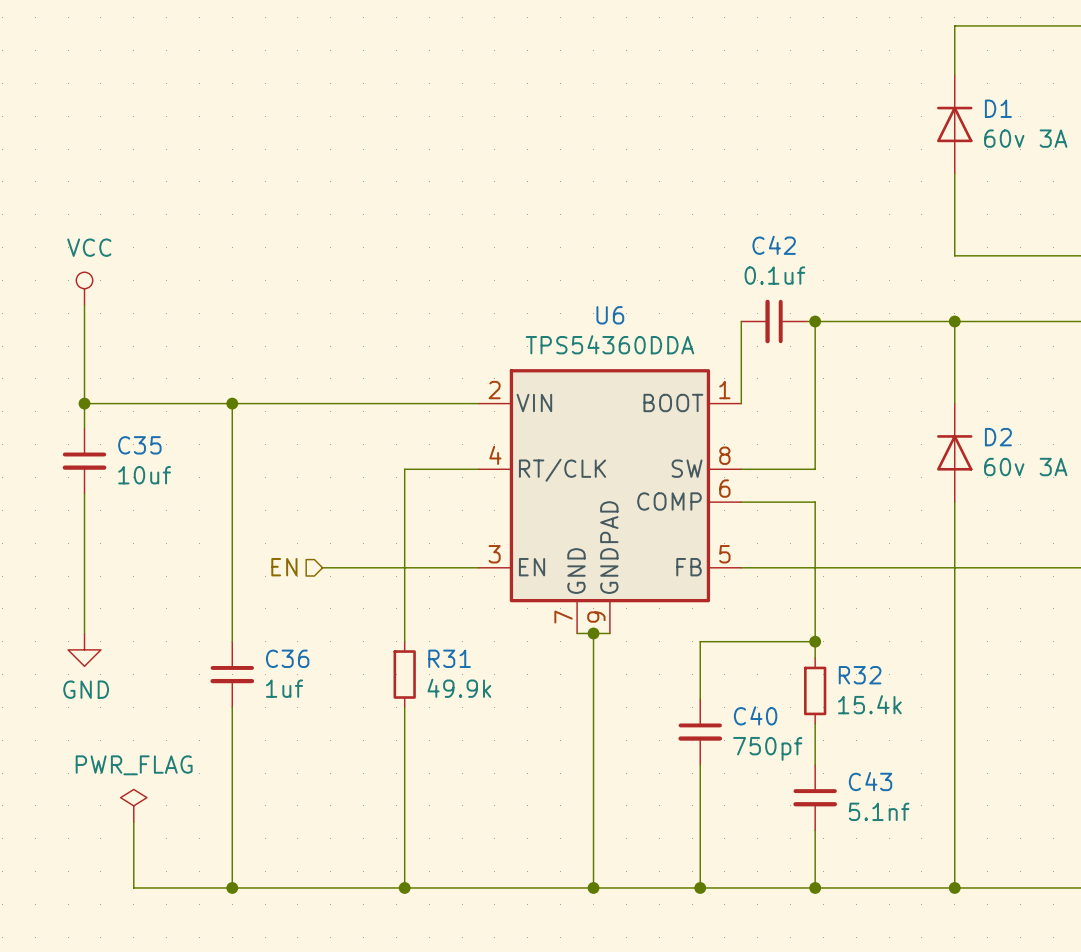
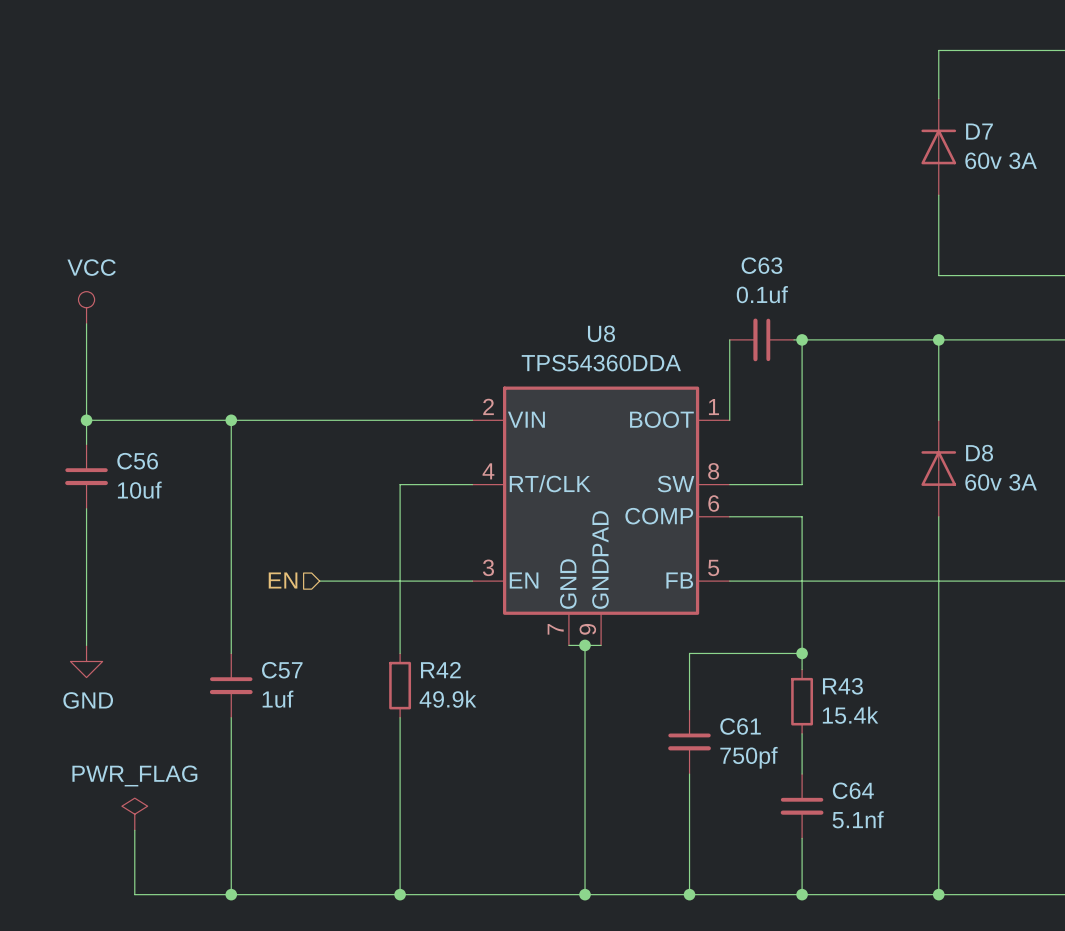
D1 name: D1 (998, 108) -> D7 (979, 131)
C42 name: C42 (774, 245) -> C63 (761, 265)
U6 name: U6 (610, 315) -> U8 (601, 333)
D2 name: D2 (998, 437) -> D8 (979, 453)
C35 name: C35 (139, 445) -> C56 (137, 461)
C36 name: C36 (287, 658) -> C57 (282, 670)
R31 name: R31 (449, 658) -> R42 (440, 670)
R32 name: R32 (860, 675) -> R43 (842, 686)
C40 name: C40 (755, 715) -> C61 (740, 726)
C43 name: C43 (870, 781) -> C64 (853, 790)

